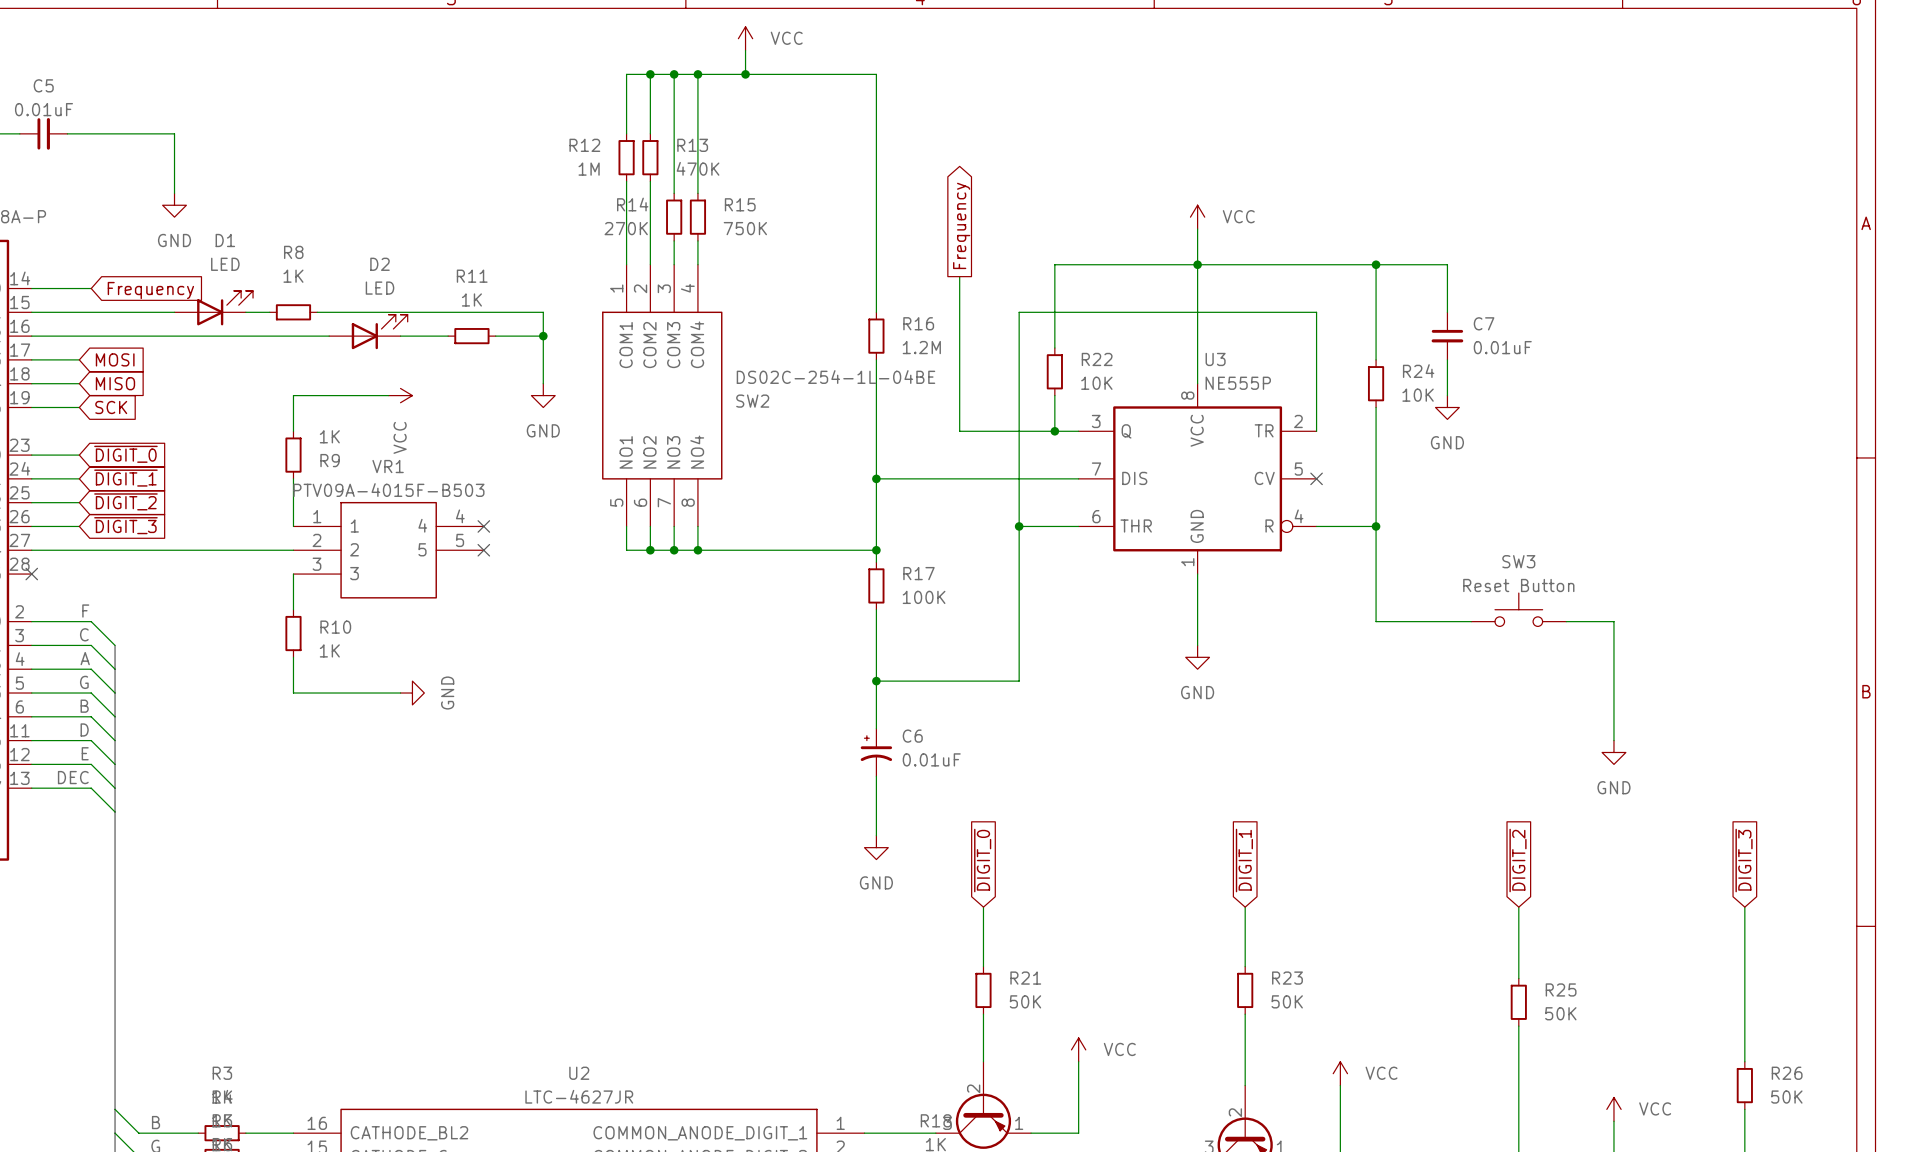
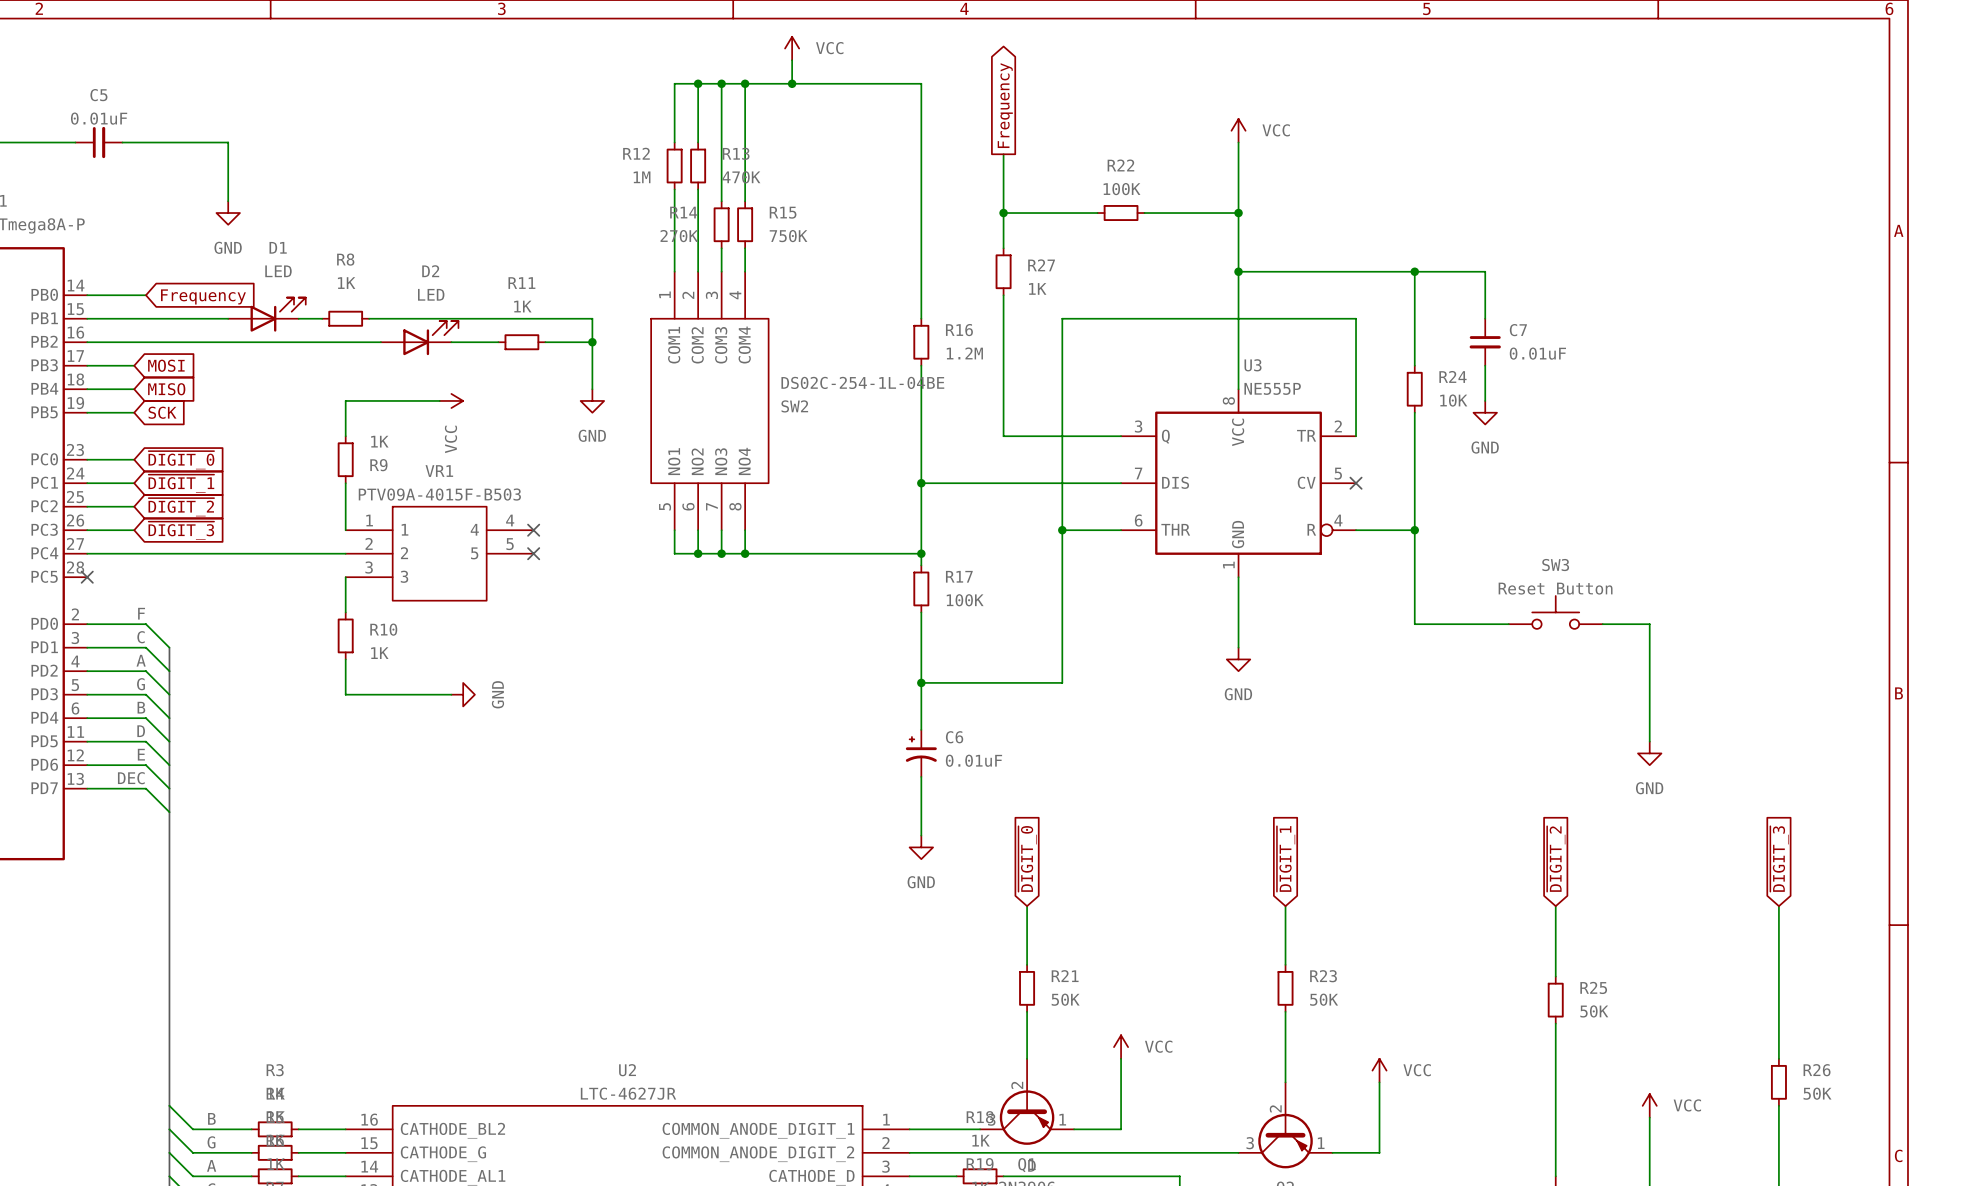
wire: none -> (1238, 142) (1238, 236)
wire: none -> (1003, 154) (1003, 248)
wire: none -> (1003, 213) (1097, 213)
junction: none -> (1003, 213)
wire: none -> (1144, 213) (1238, 213)
junction: none -> (1238, 213)
power symbol position: VCC (1197, 217) -> VCC (1238, 130)
global label position: Frequency (961, 225) -> Frequency (1005, 105)
R27: none -> 1K (1003, 271)
wire: (1197, 264) (1054, 264) (1054, 348) -> none
R22 name position: R22 (1097, 359) -> R22 (1120, 165)
R22 rotation: 0° (1054, 371) -> 90° clockwise (1121, 213)
R22 position: (1054, 371) -> (1121, 213)
R22 value: 10K (1096, 383) -> 100K (1121, 189)
wire: (1054, 395) (1054, 431) -> none
junction: (1054, 431) -> none

